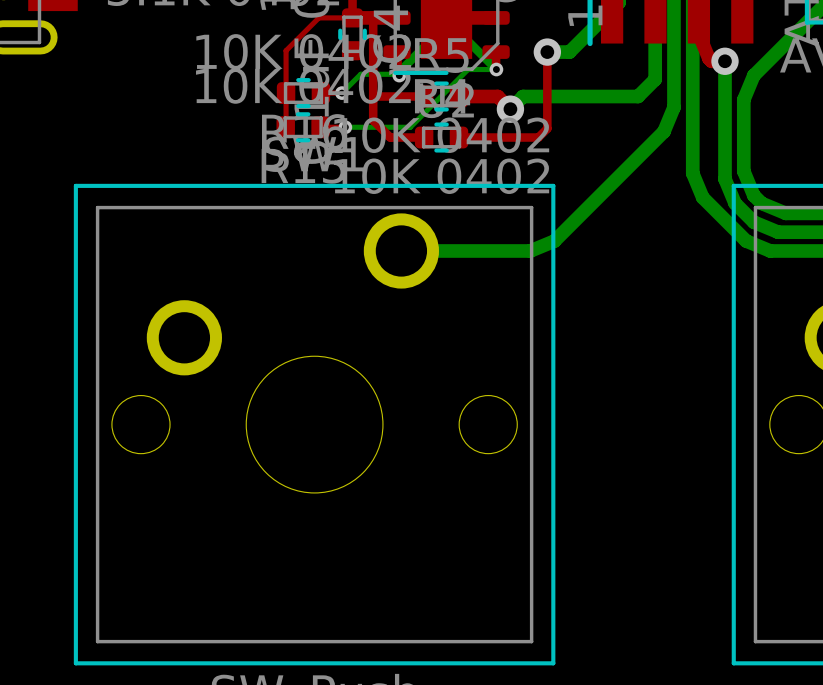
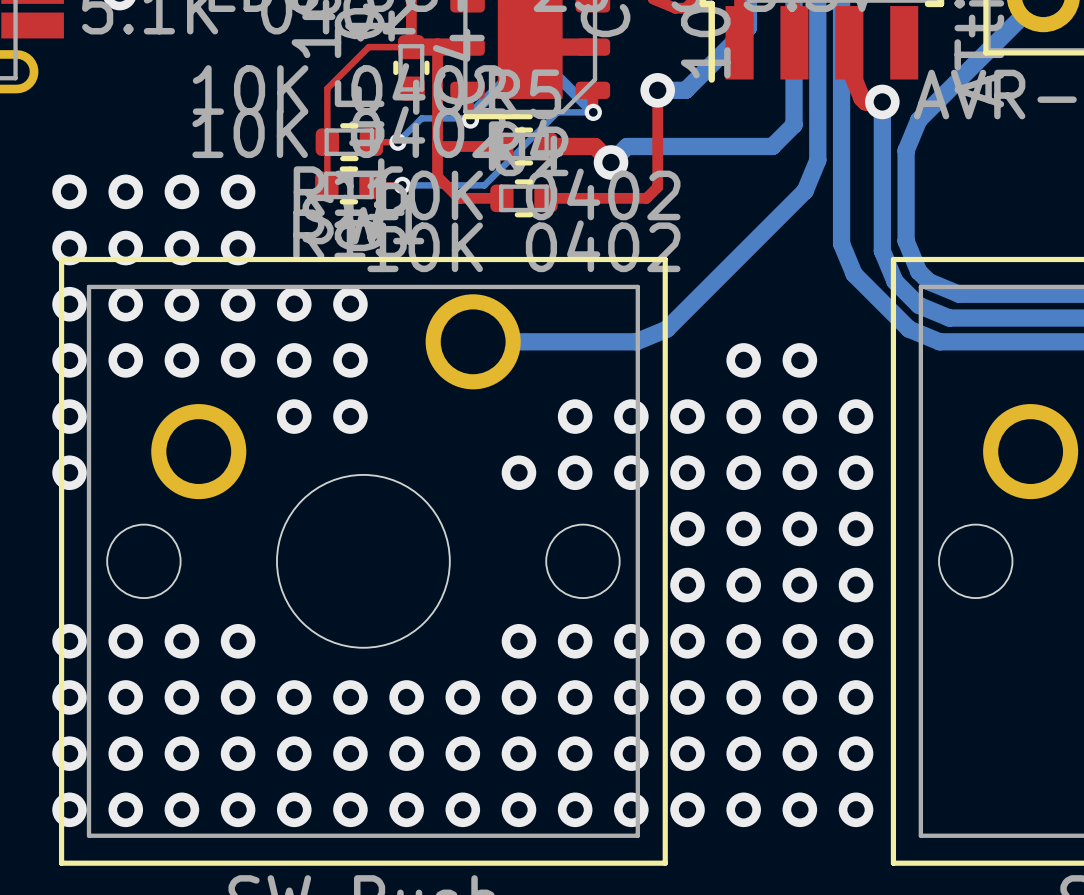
via: none -> (69, 191)
via: none -> (125, 191)
via: none -> (181, 191)
via: none -> (238, 191)
via: none -> (69, 248)
via: none -> (125, 248)
via: none -> (181, 248)
via: none -> (238, 248)
via: none -> (69, 304)
via: none -> (125, 304)
via: none -> (181, 304)
via: none -> (238, 304)
via: none -> (294, 304)
via: none -> (350, 304)
via: none -> (69, 360)
via: none -> (125, 360)
via: none -> (181, 360)
via: none -> (238, 360)
via: none -> (294, 360)
via: none -> (350, 360)
via: none -> (743, 360)
via: none -> (799, 360)
via: none -> (69, 416)
via: none -> (294, 416)
via: none -> (350, 416)
via: none -> (575, 416)
via: none -> (631, 416)
via: none -> (687, 416)
via: none -> (743, 416)
via: none -> (799, 416)
via: none -> (856, 416)
via: none -> (69, 472)
via: none -> (518, 472)
via: none -> (575, 472)
via: none -> (631, 472)
via: none -> (687, 472)
via: none -> (743, 472)
via: none -> (799, 472)
via: none -> (856, 472)
via: none -> (687, 528)
via: none -> (743, 528)
via: none -> (799, 528)
via: none -> (856, 528)
via: none -> (687, 585)
via: none -> (743, 585)
via: none -> (799, 585)
via: none -> (856, 585)
via: none -> (69, 641)
via: none -> (125, 641)
via: none -> (181, 641)
via: none -> (238, 641)
via: none -> (518, 641)
via: none -> (575, 641)
via: none -> (631, 641)
via: none -> (687, 641)
via: none -> (743, 641)
via: none -> (799, 641)
via: none -> (856, 641)
via: none -> (69, 697)
via: none -> (125, 697)
via: none -> (181, 697)
via: none -> (238, 697)
via: none -> (294, 697)
via: none -> (350, 697)
via: none -> (406, 697)
via: none -> (462, 697)
via: none -> (518, 697)
via: none -> (575, 697)
via: none -> (631, 697)
via: none -> (687, 697)
via: none -> (743, 697)
via: none -> (799, 697)
via: none -> (856, 697)
via: none -> (69, 753)
via: none -> (125, 753)
via: none -> (181, 753)
via: none -> (238, 753)
via: none -> (294, 753)
via: none -> (350, 753)
via: none -> (406, 753)
via: none -> (462, 753)
via: none -> (518, 753)
via: none -> (575, 753)
via: none -> (631, 753)
via: none -> (687, 753)
via: none -> (743, 753)
via: none -> (799, 753)
via: none -> (856, 753)
via: none -> (69, 809)
via: none -> (125, 809)
via: none -> (181, 809)
via: none -> (238, 809)
via: none -> (294, 809)
via: none -> (350, 809)
via: none -> (406, 809)
via: none -> (462, 809)
via: none -> (518, 809)
via: none -> (575, 809)
via: none -> (631, 809)
via: none -> (687, 809)
via: none -> (743, 809)
via: none -> (799, 809)
via: none -> (856, 809)

